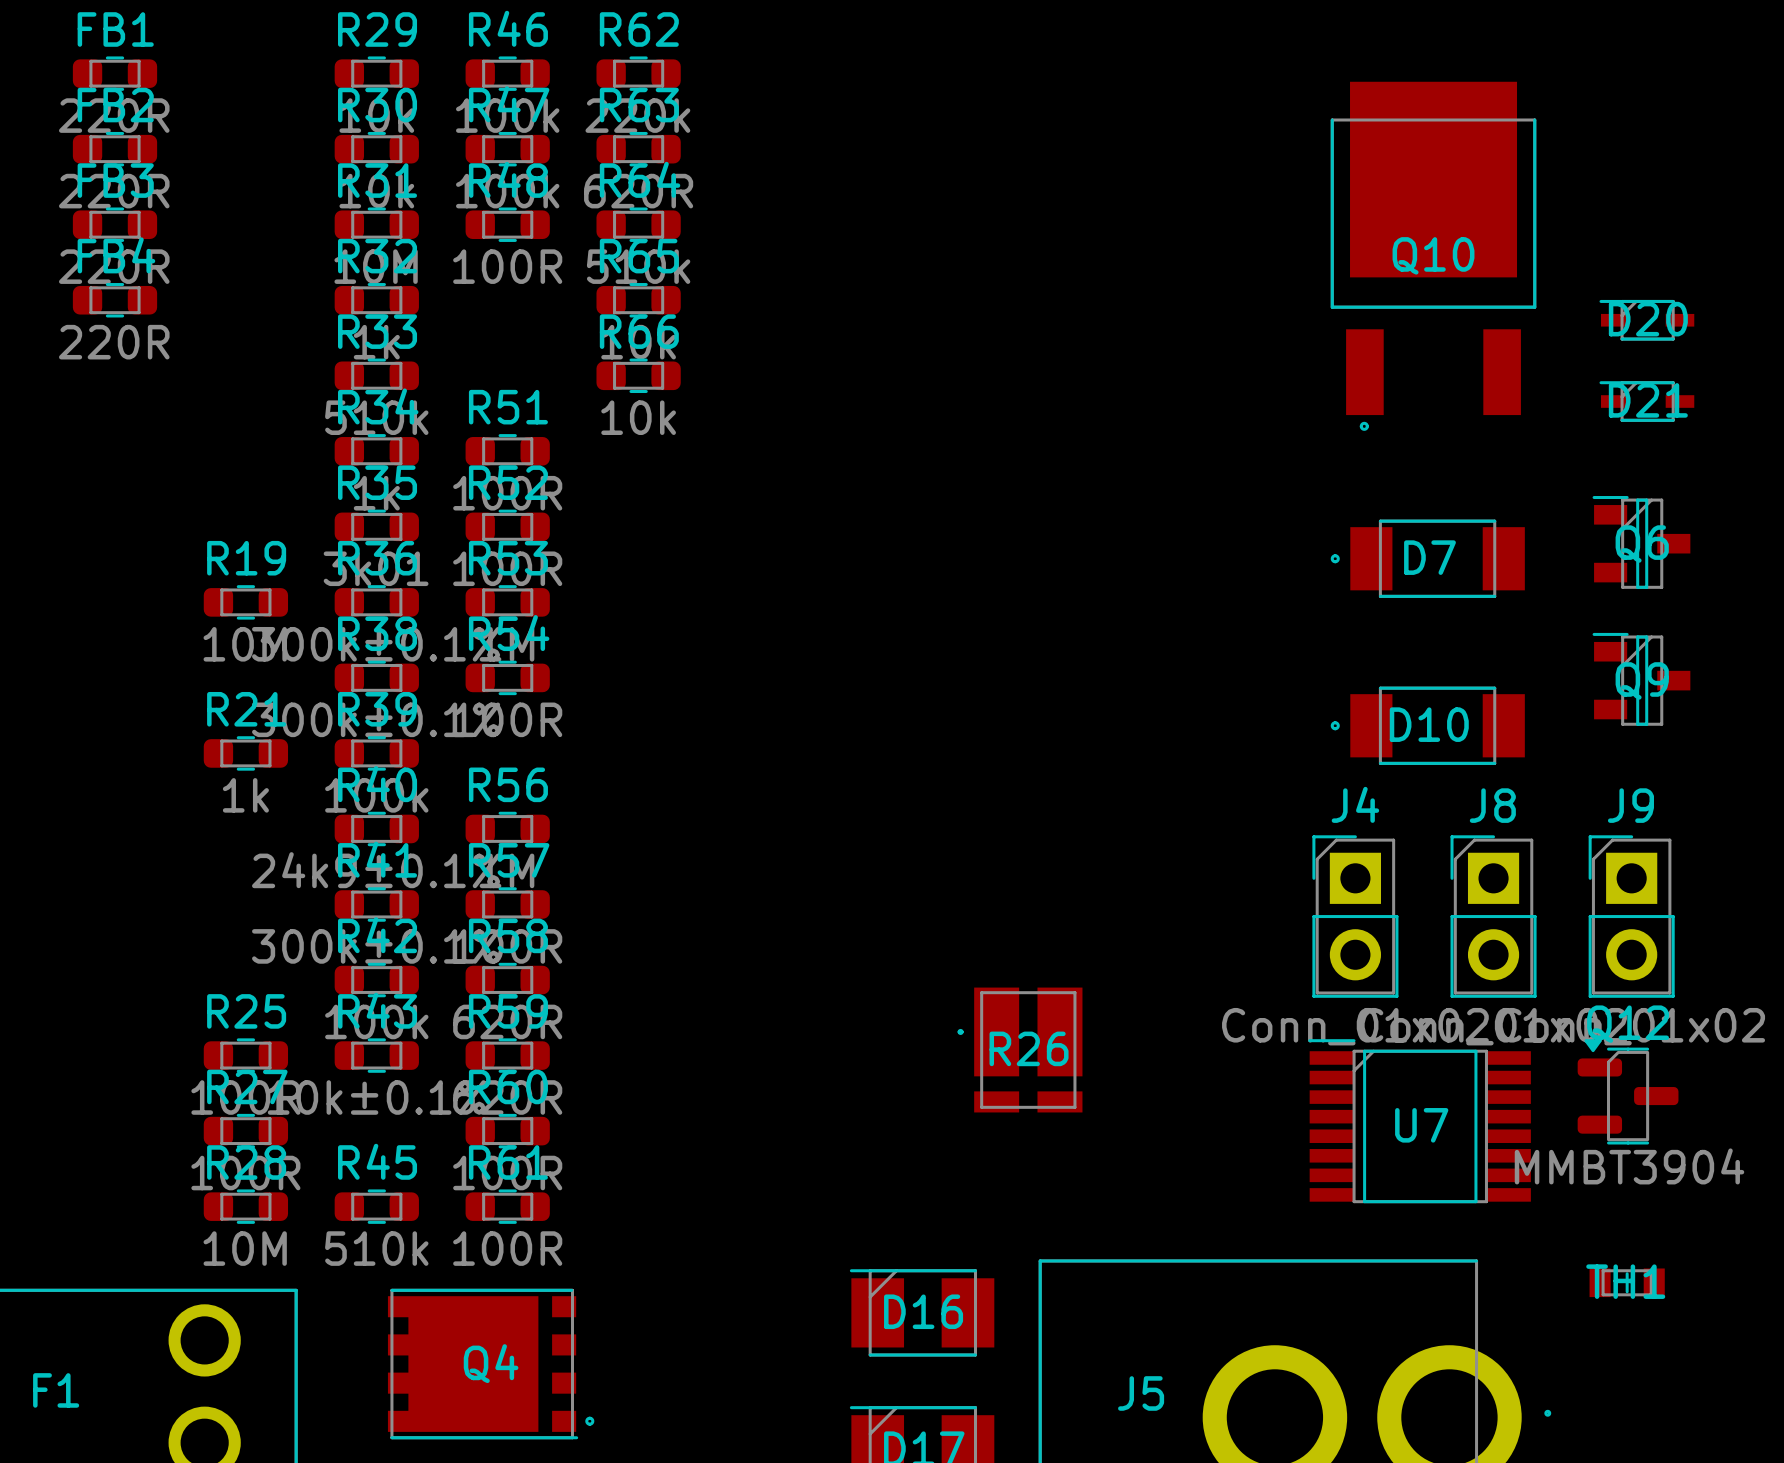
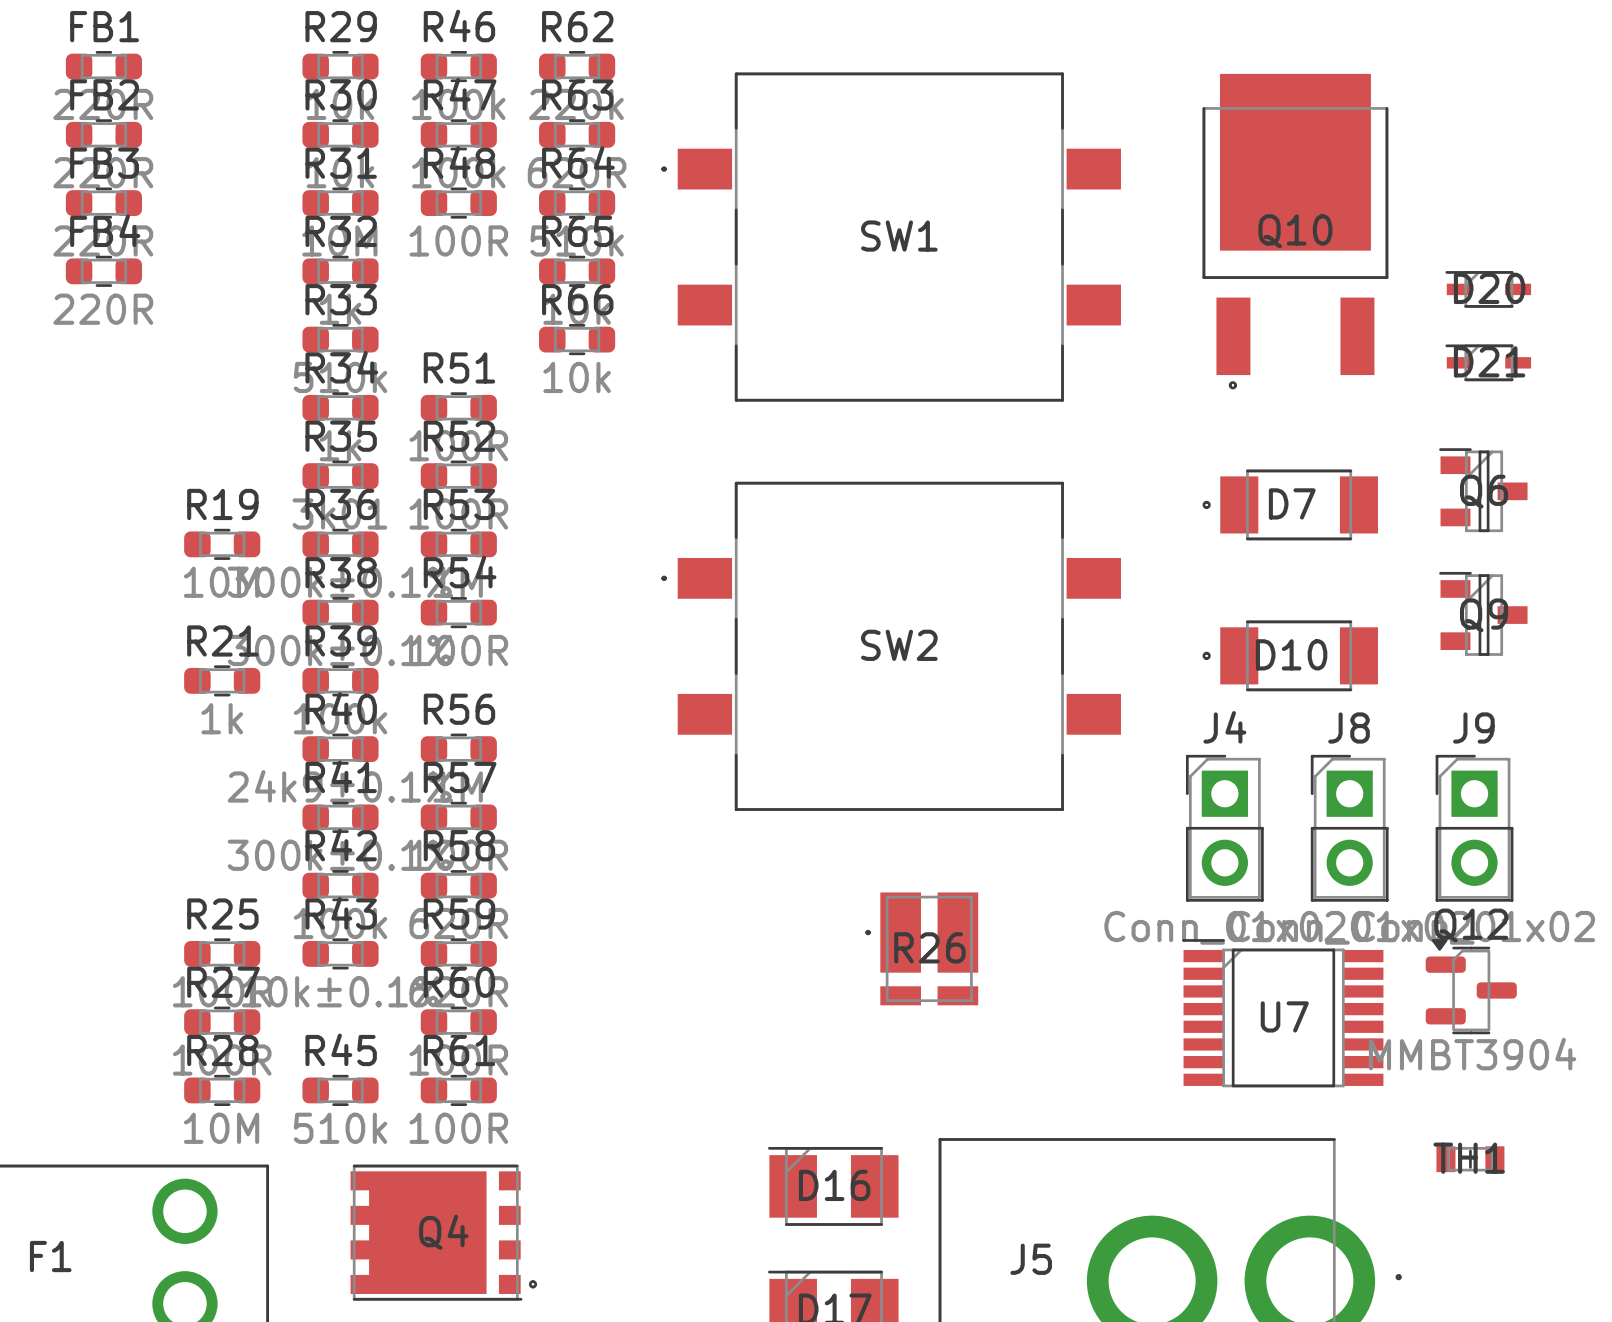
SW1: none -> (891, 237)
SW2: none -> (891, 646)

